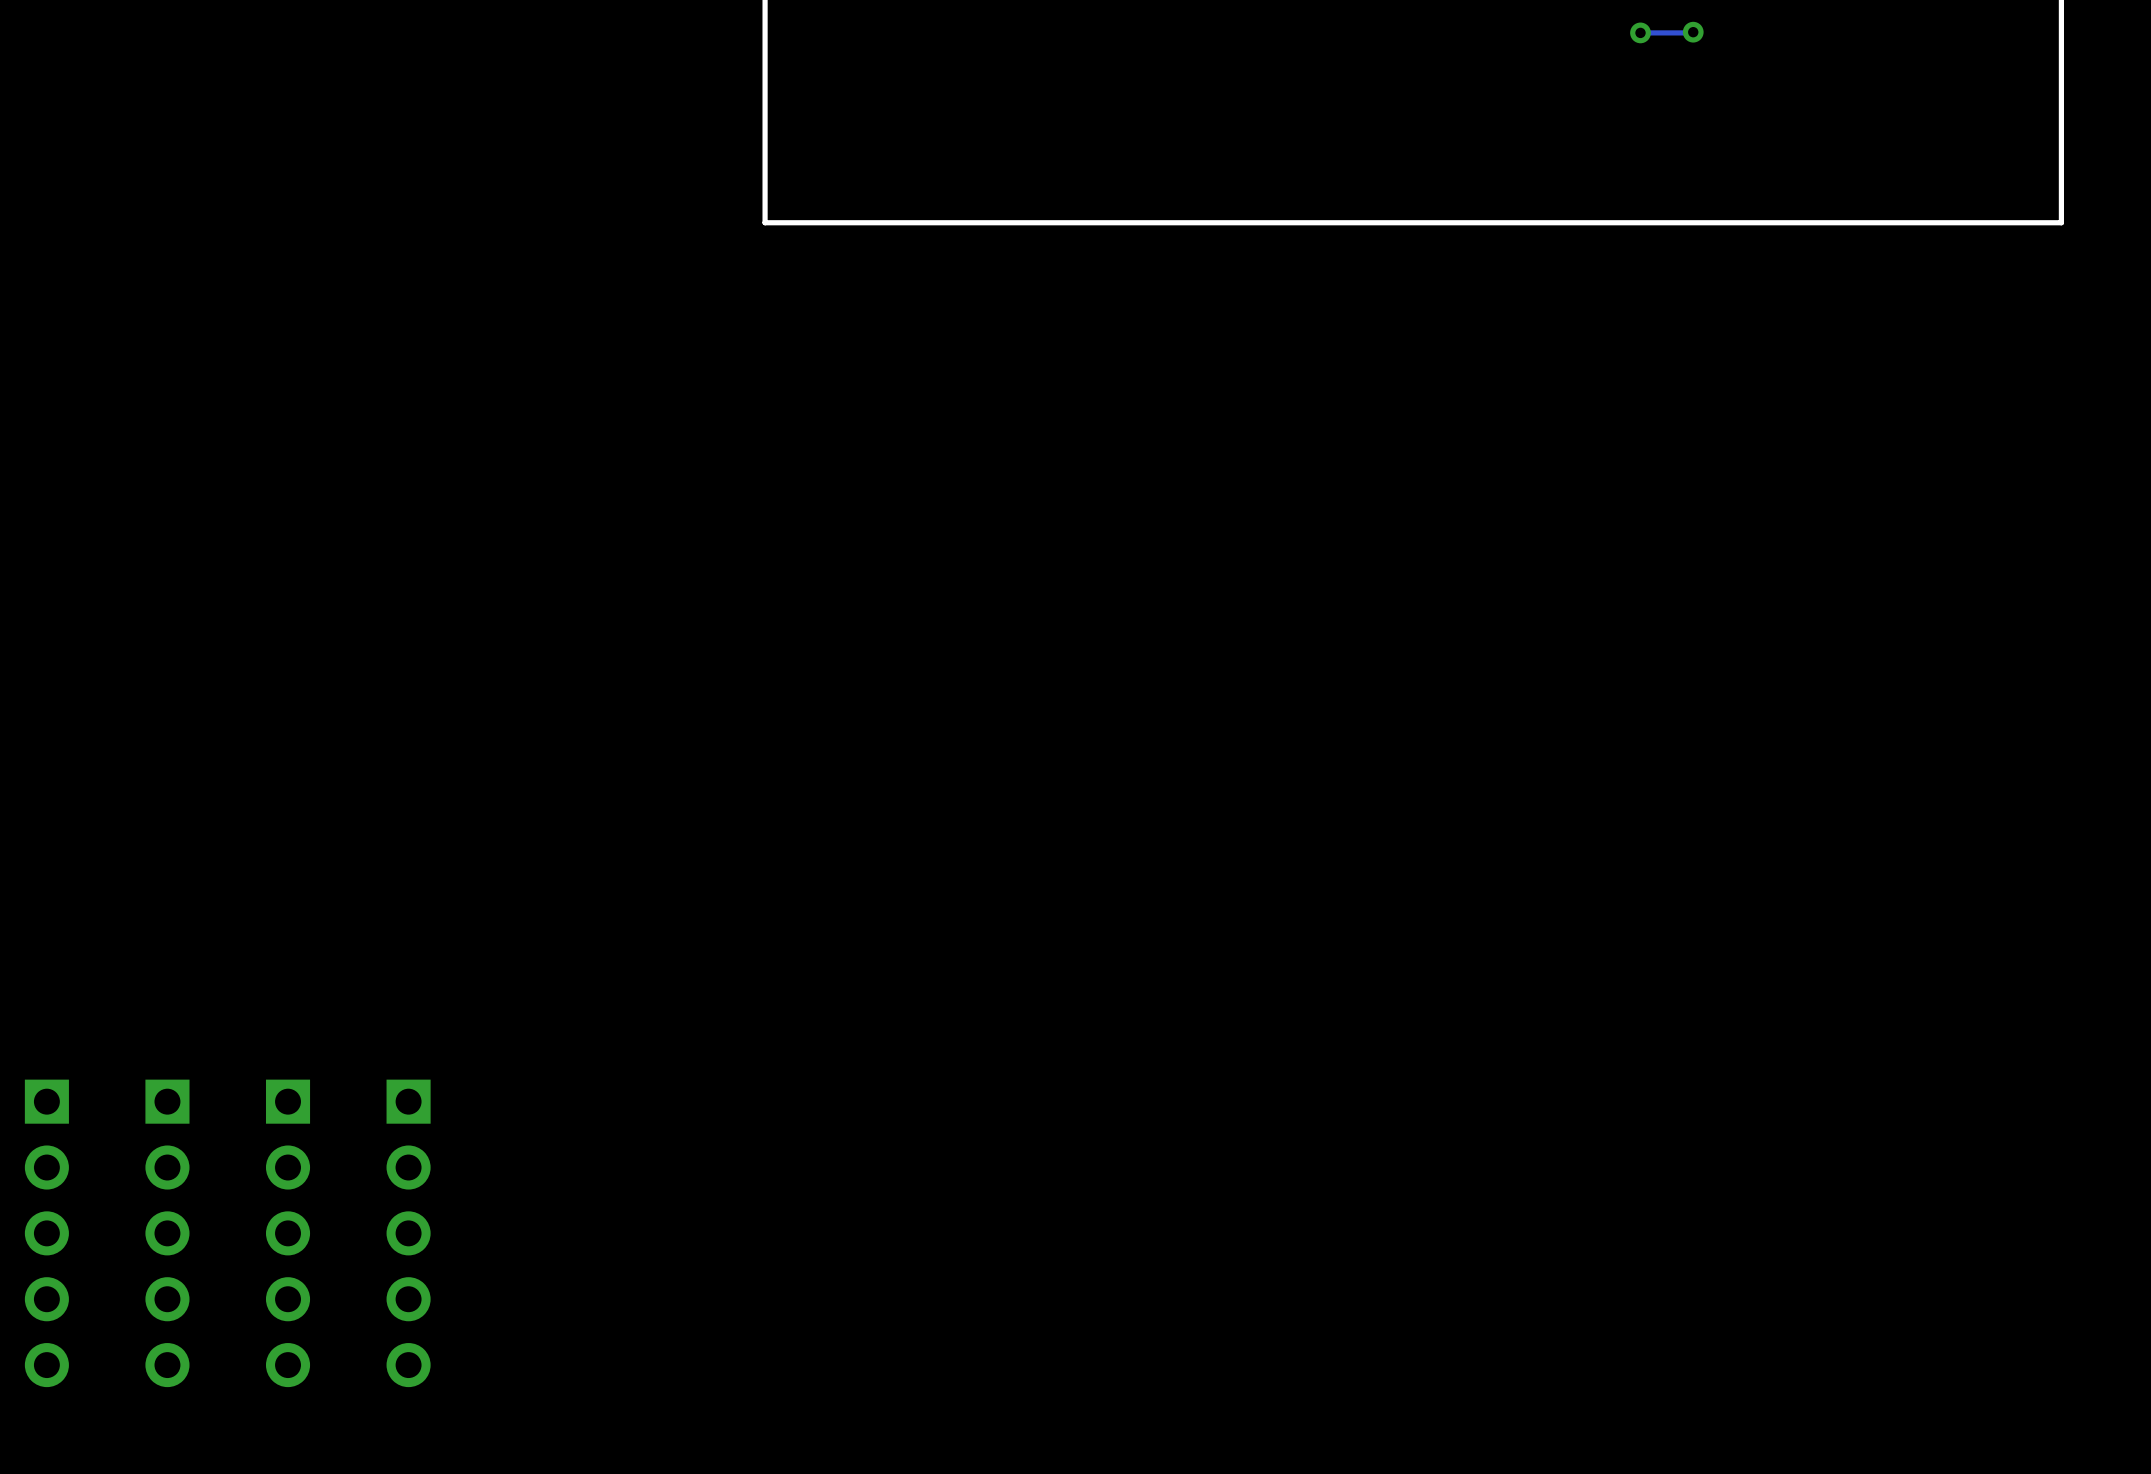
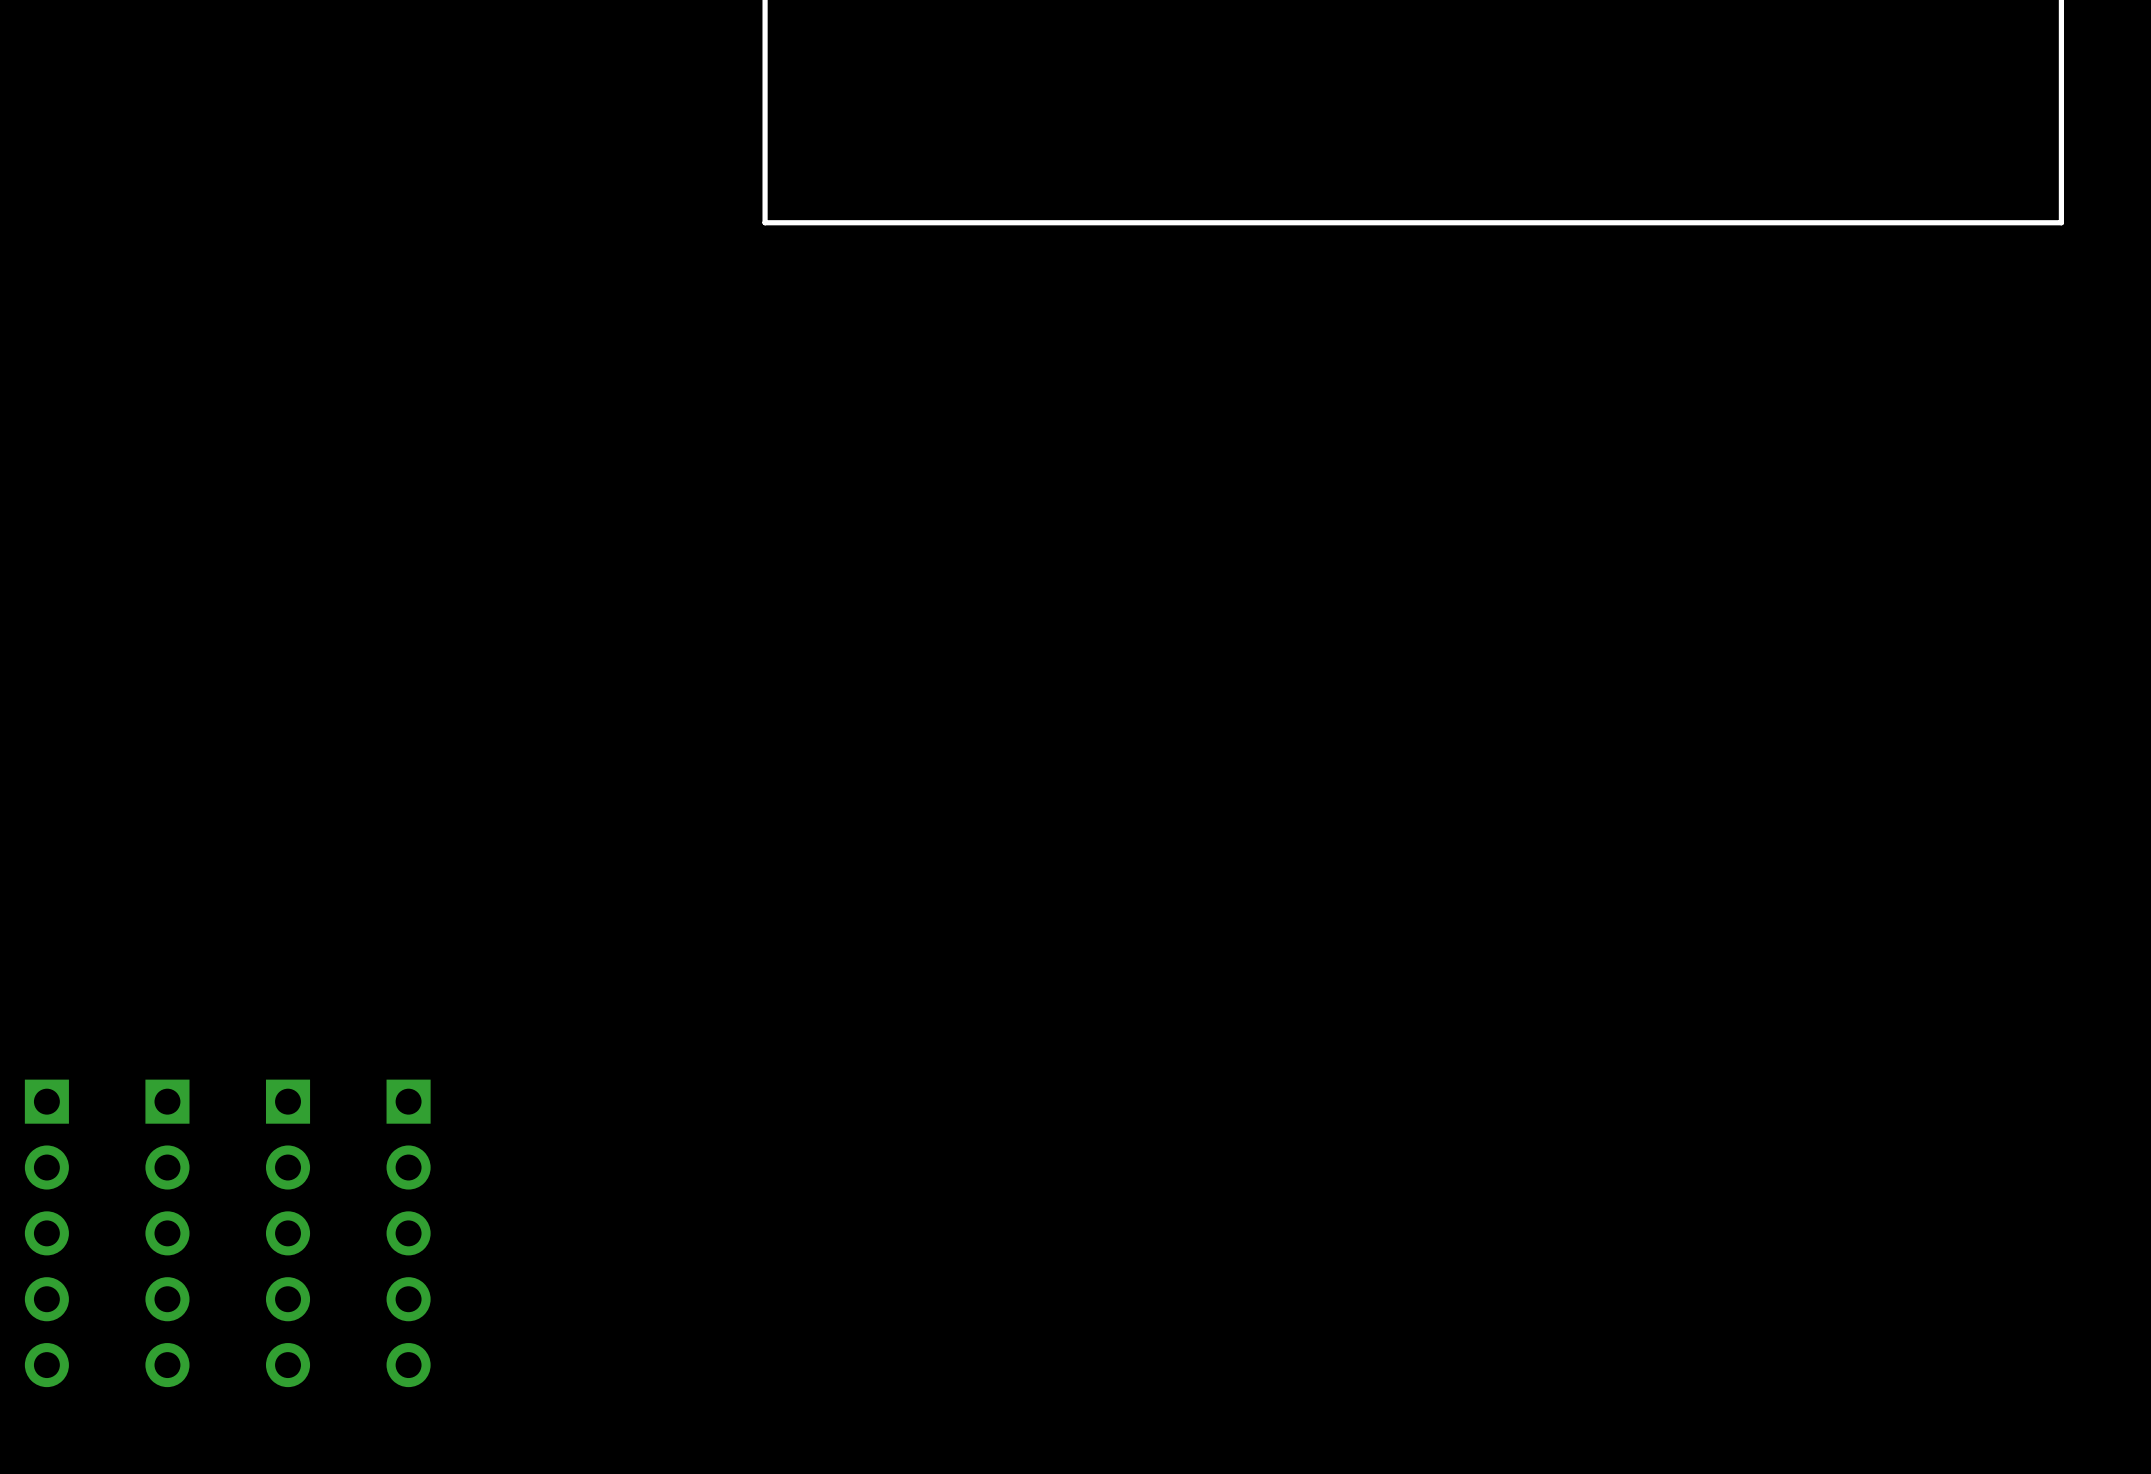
via: (1640, 32) -> none
track: (1693, 32) (1640, 32) -> none
via: (1693, 32) -> none

